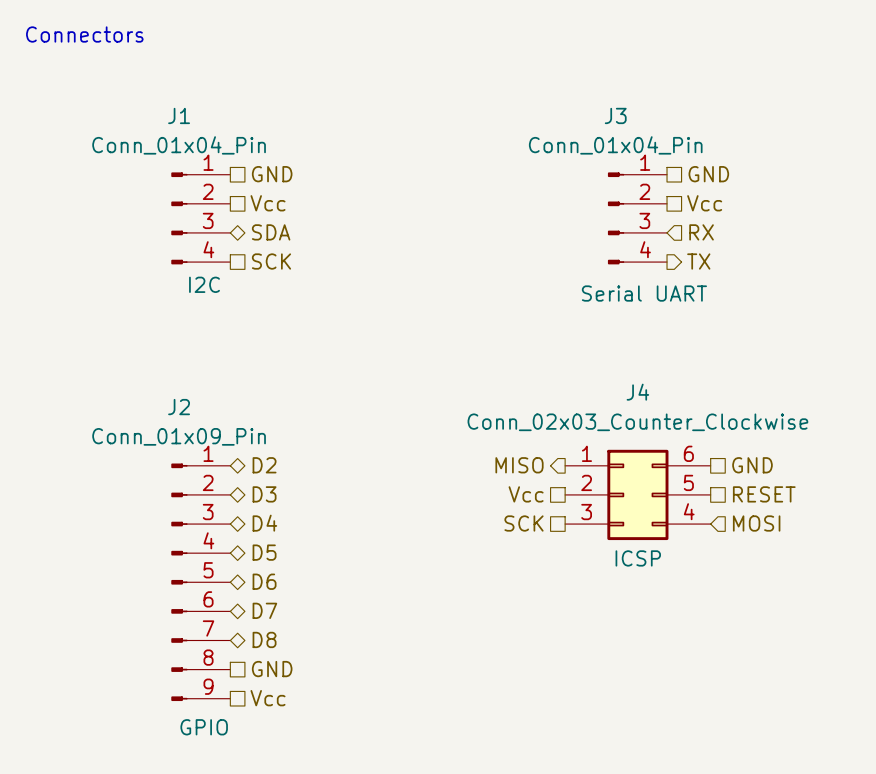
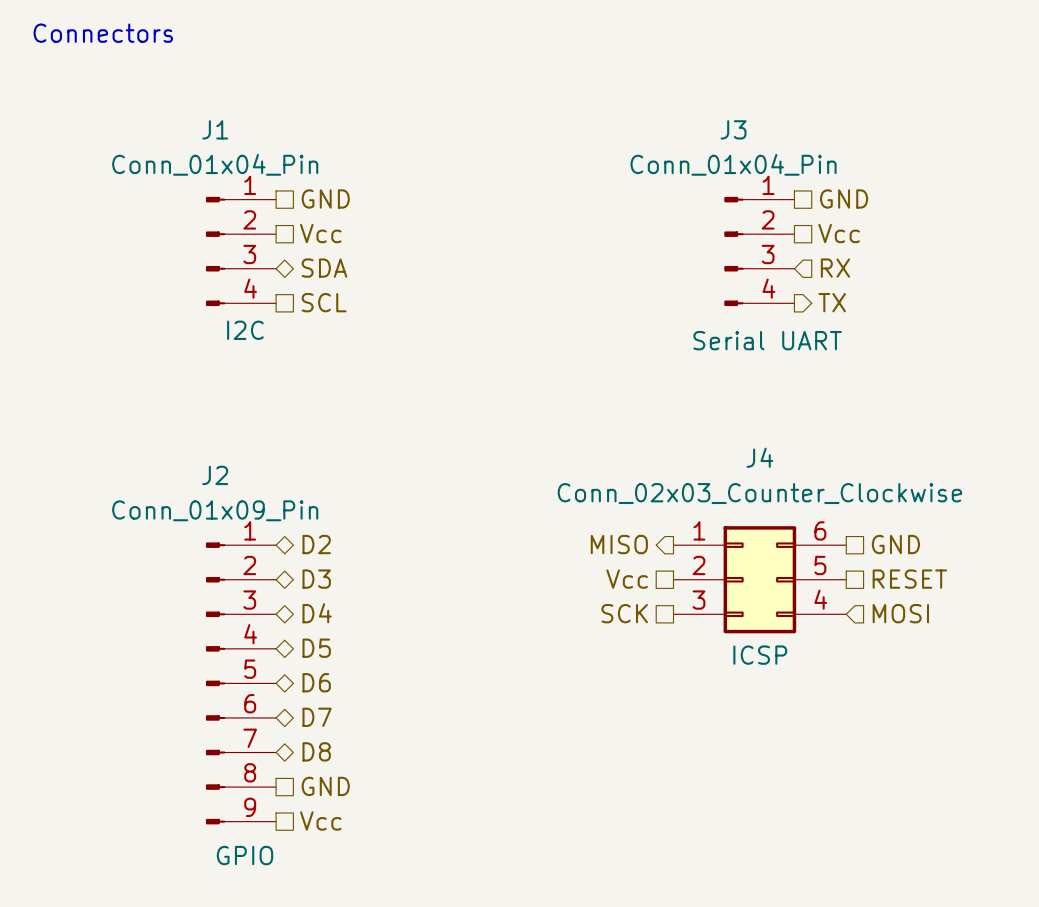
hierarchical label: SCK (271, 261) -> SCL (324, 302)

